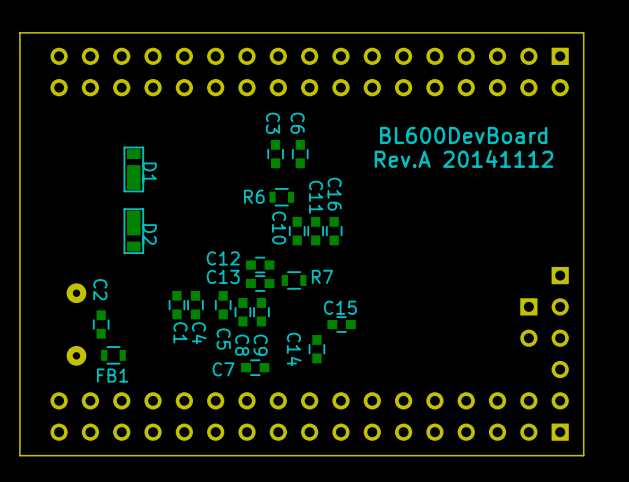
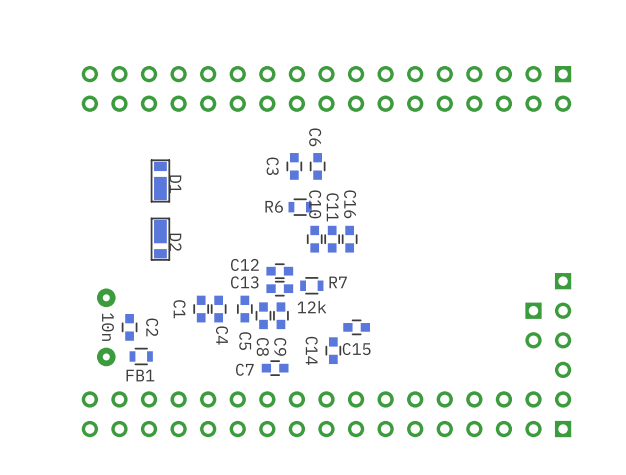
board edge: (583, 32) (583, 455) (19, 455) (19, 32) (583, 32) -> none
C3 name position: C3 (272, 123) -> C3 (272, 166)
text: BL600DevBoard (463, 135) -> none
text: Rev.A 20141112 (464, 158) -> none
C10 name position: C10 (279, 228) -> C10 (315, 204)
C2 name position: C2 (100, 289) -> C2 (152, 327)
R7 value: none -> 12k (312, 307)
C15 name position: C15 (340, 307) -> C15 (356, 349)
C2 value: none -> 10n (107, 327)
C1 name position: C1 (180, 332) -> C1 (179, 309)

